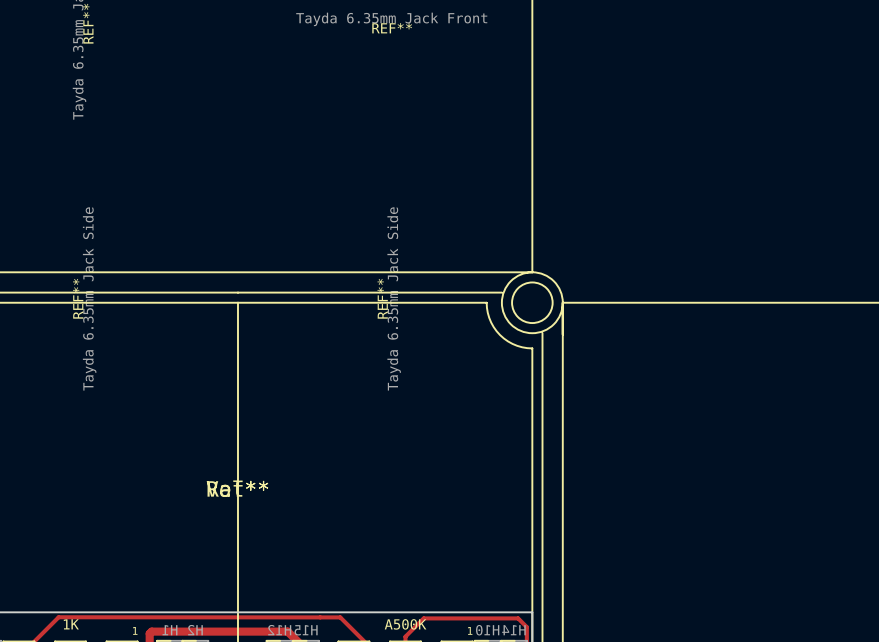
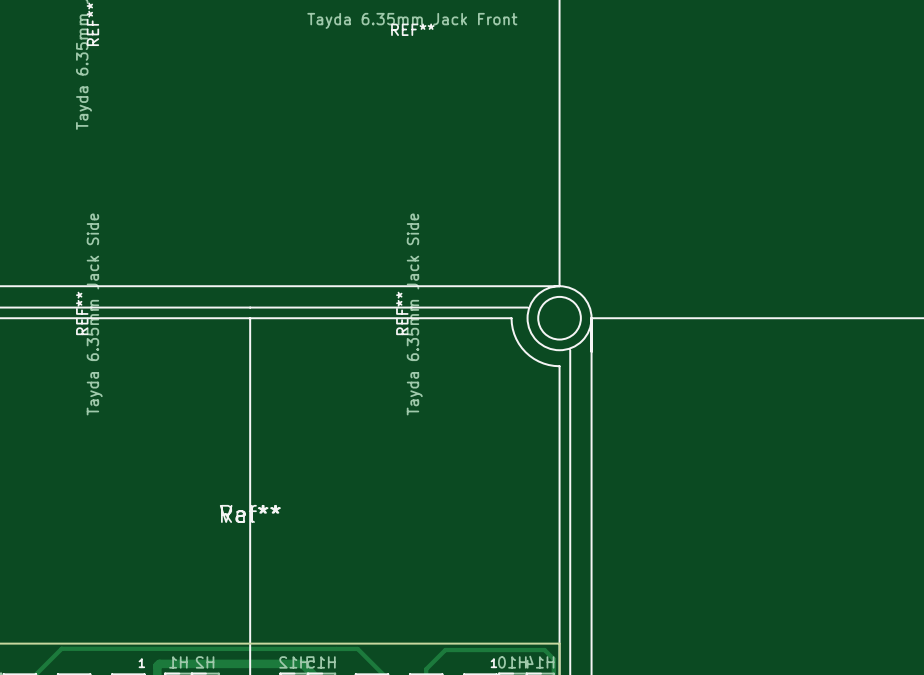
part value: 1K (71, 624) -> none
part value: A500K (405, 624) -> none

